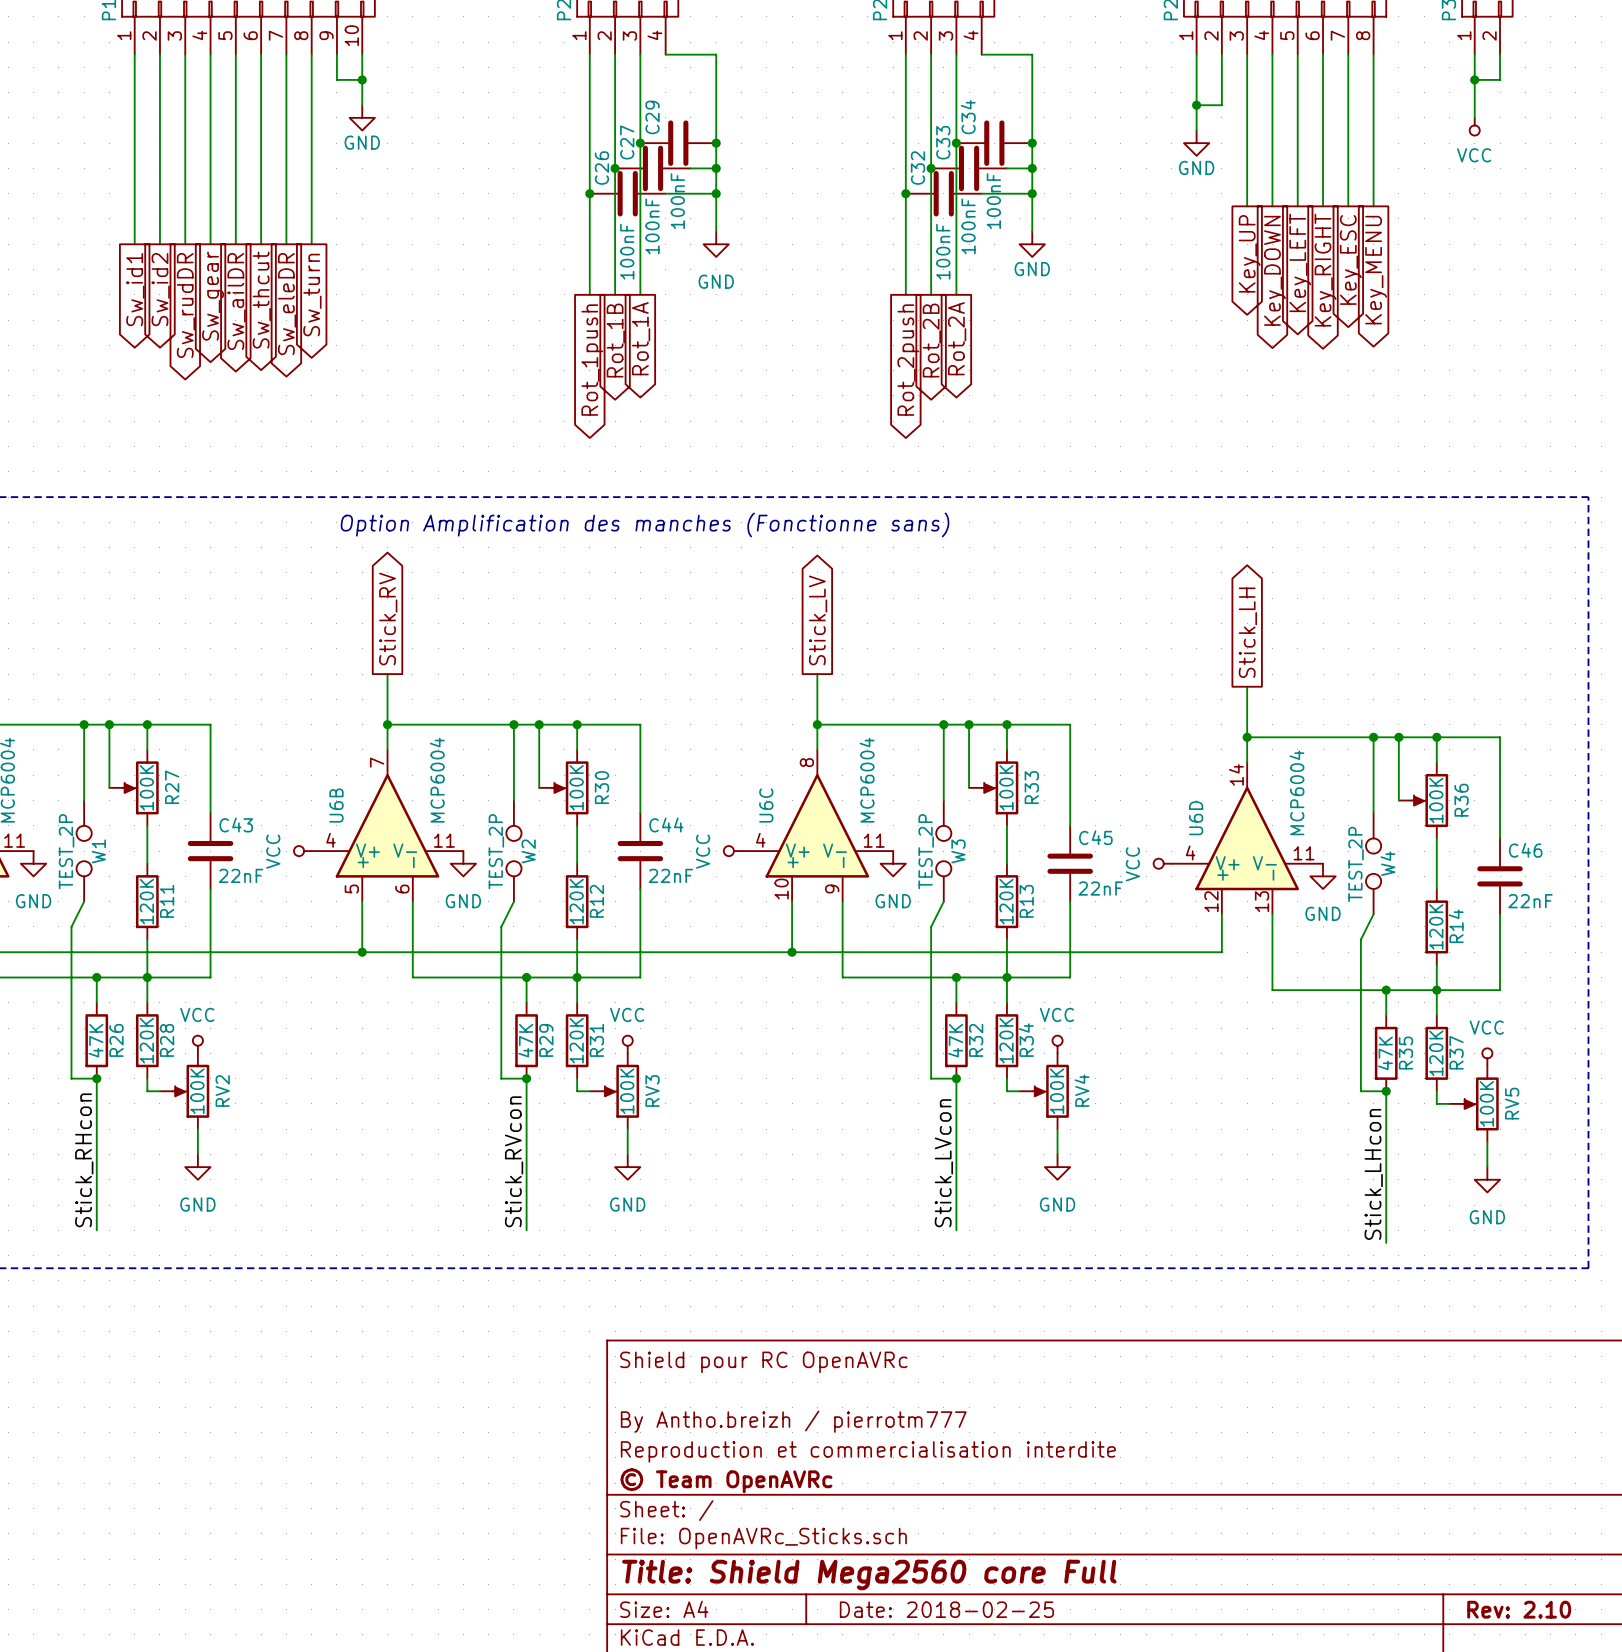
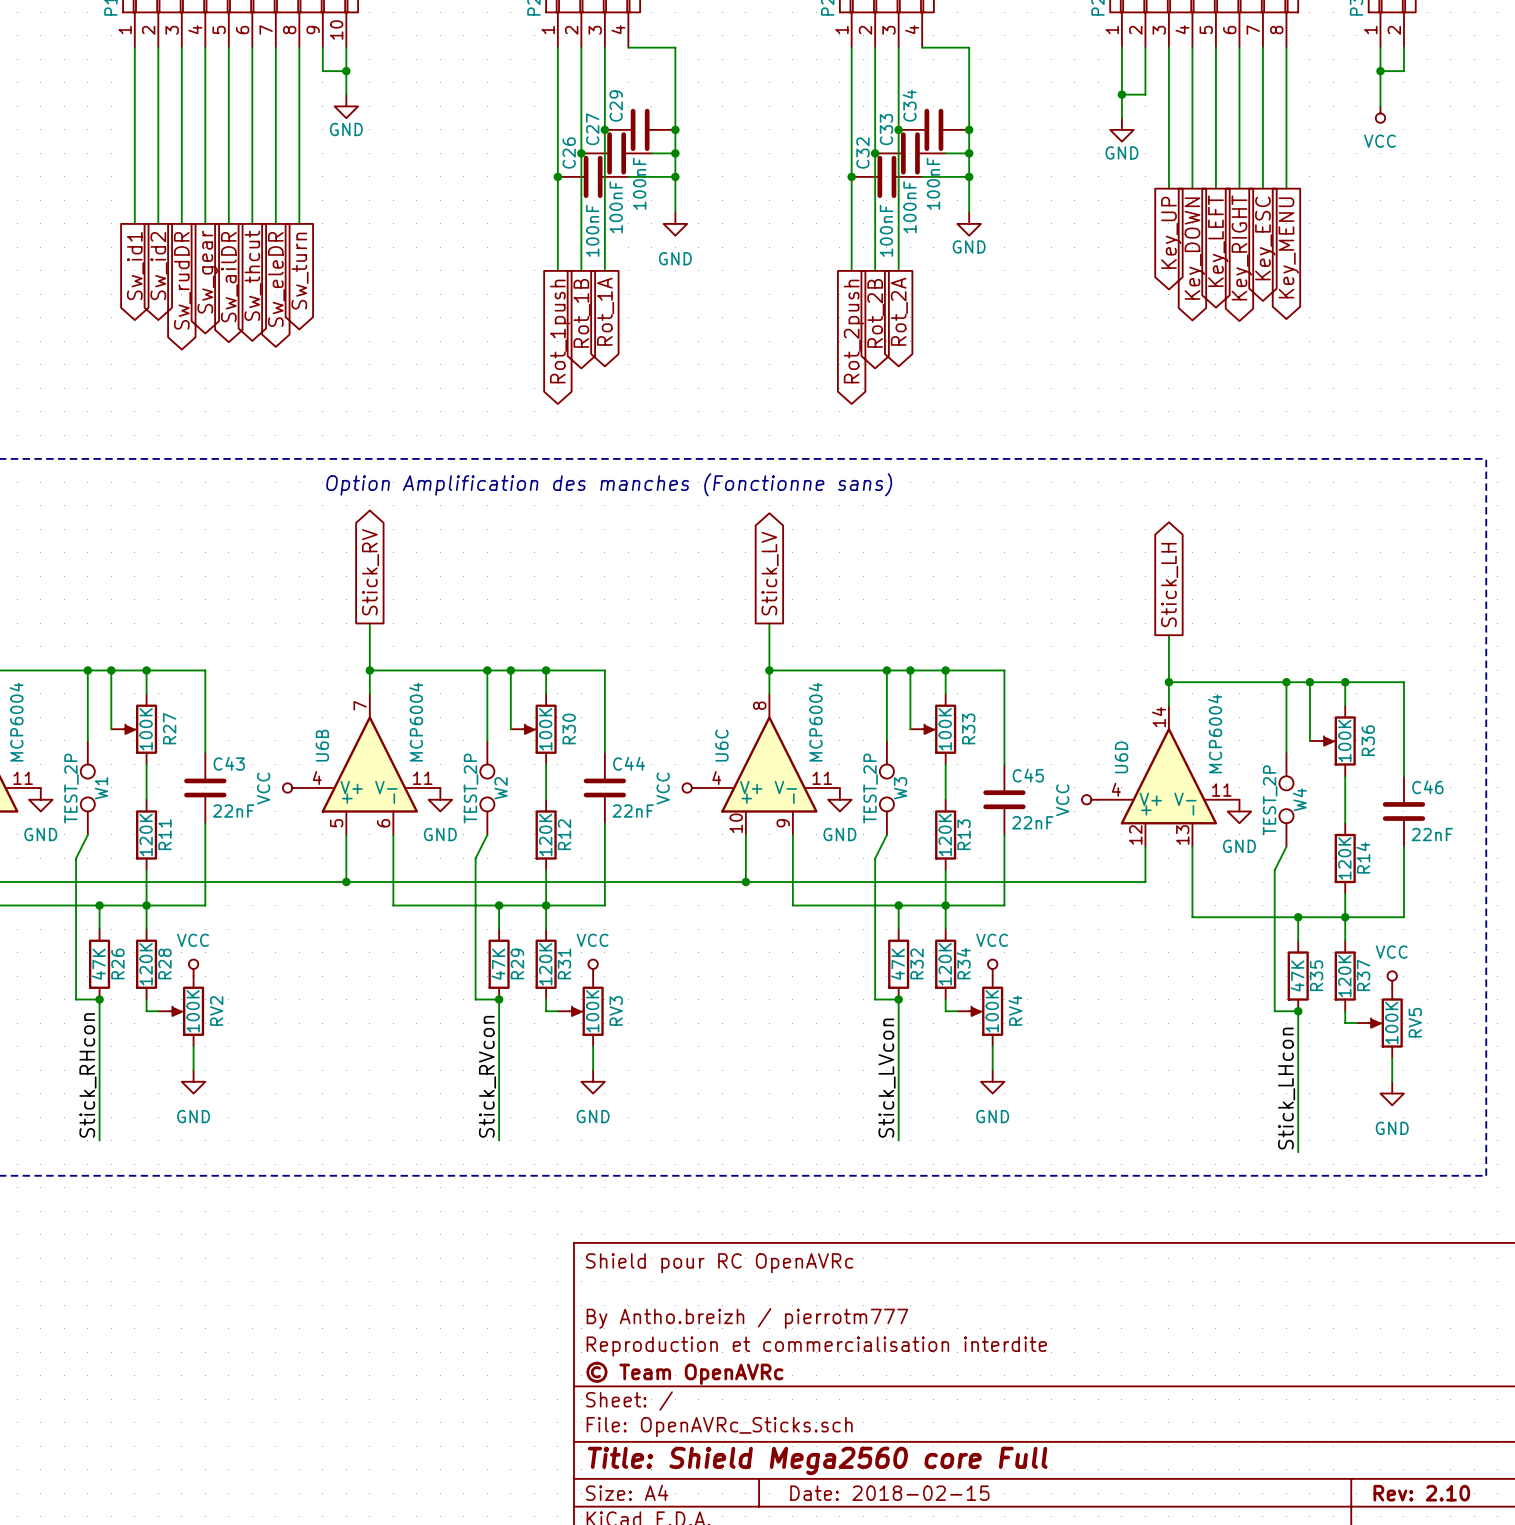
title block: Date: 2018-02-25 (946, 1609) -> Date: 2018-02-15 (889, 1493)

